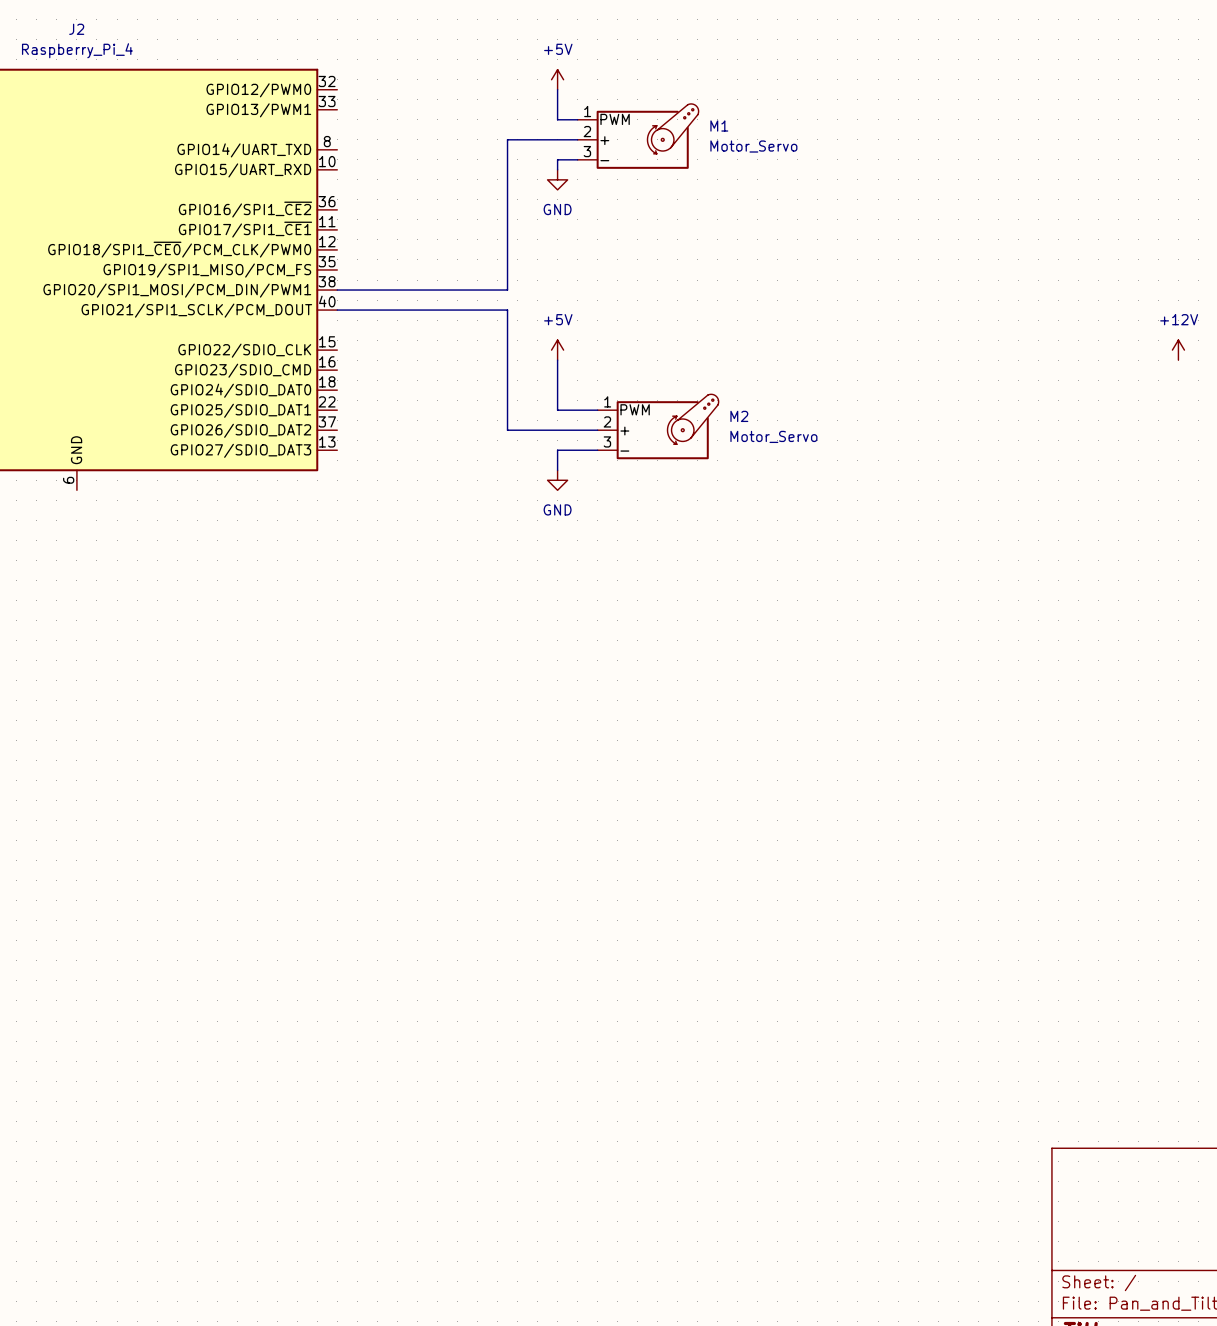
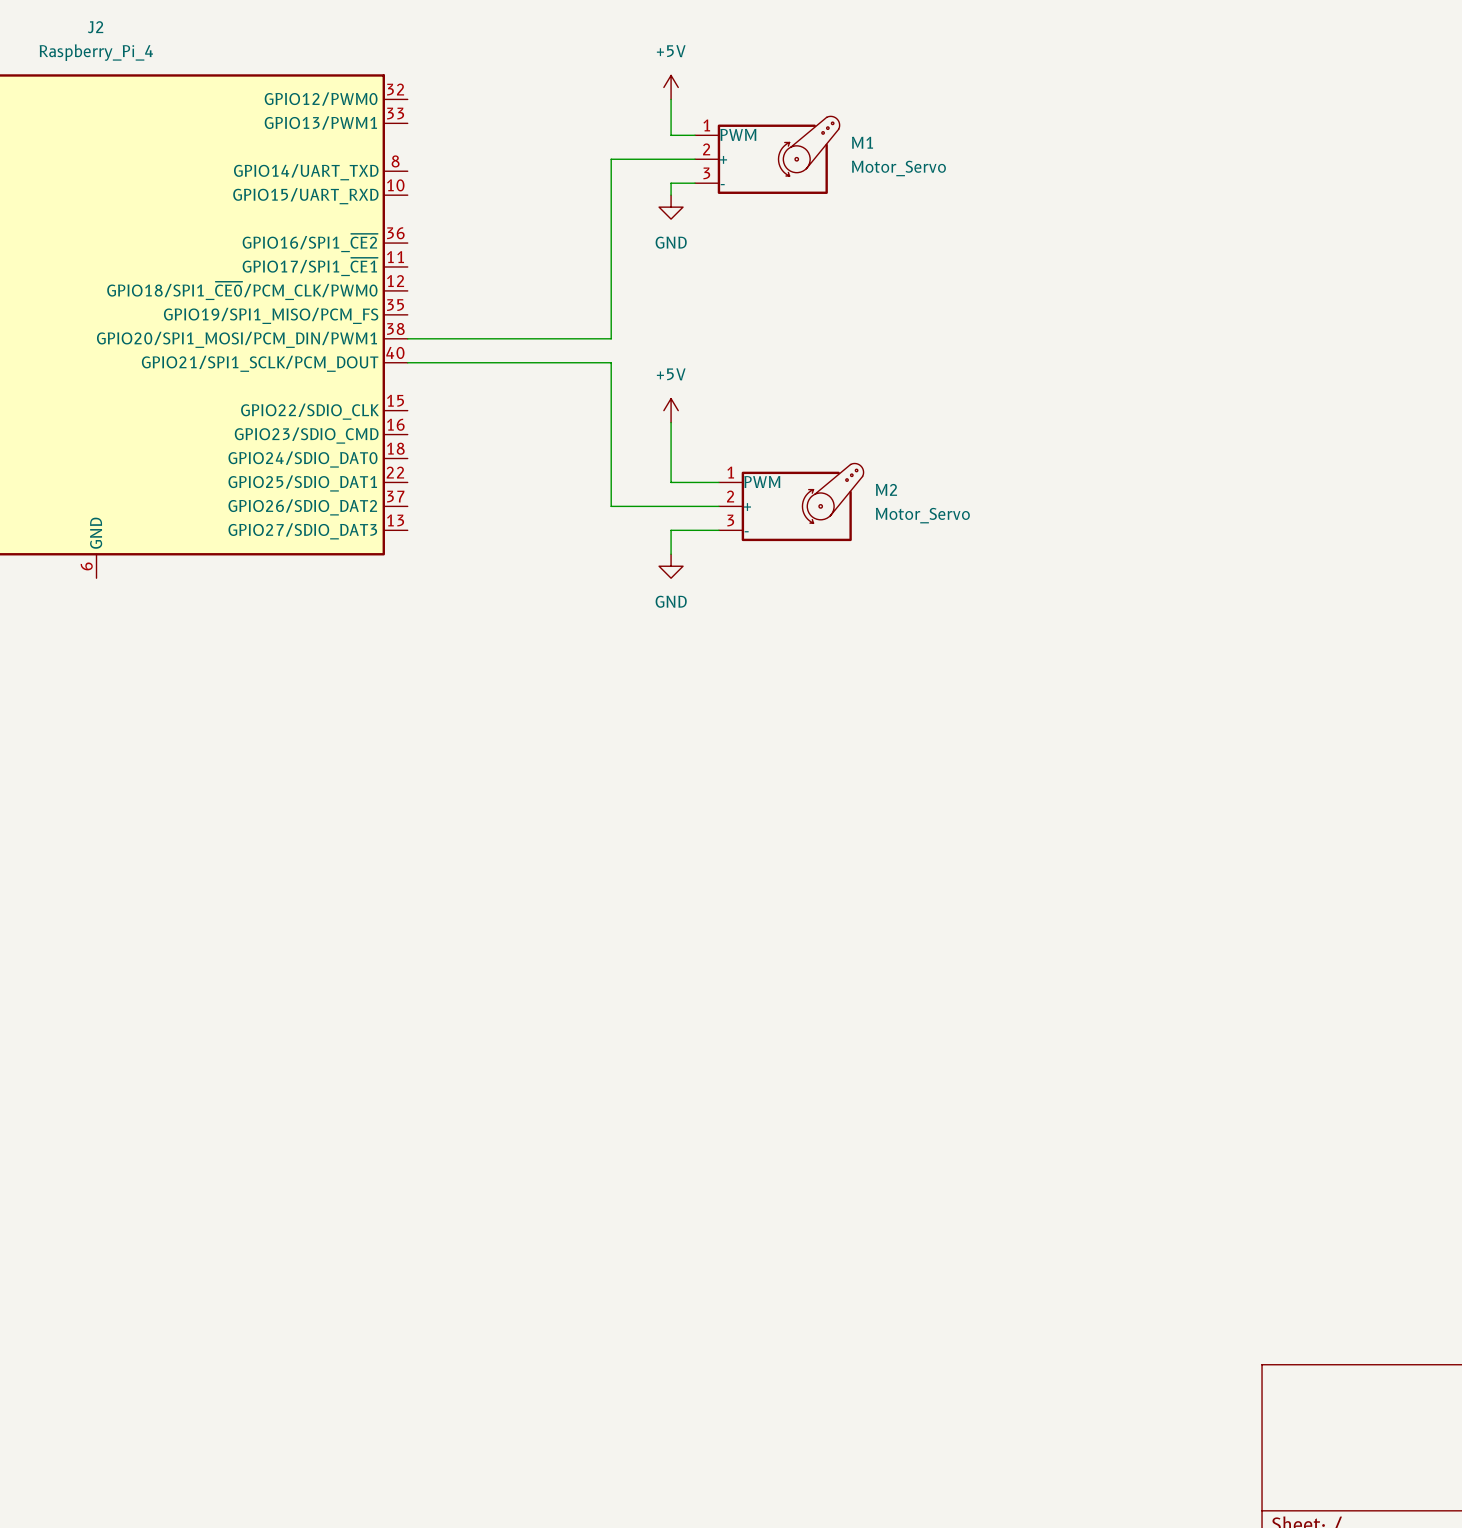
power symbol: +12V (1178, 350) -> none

